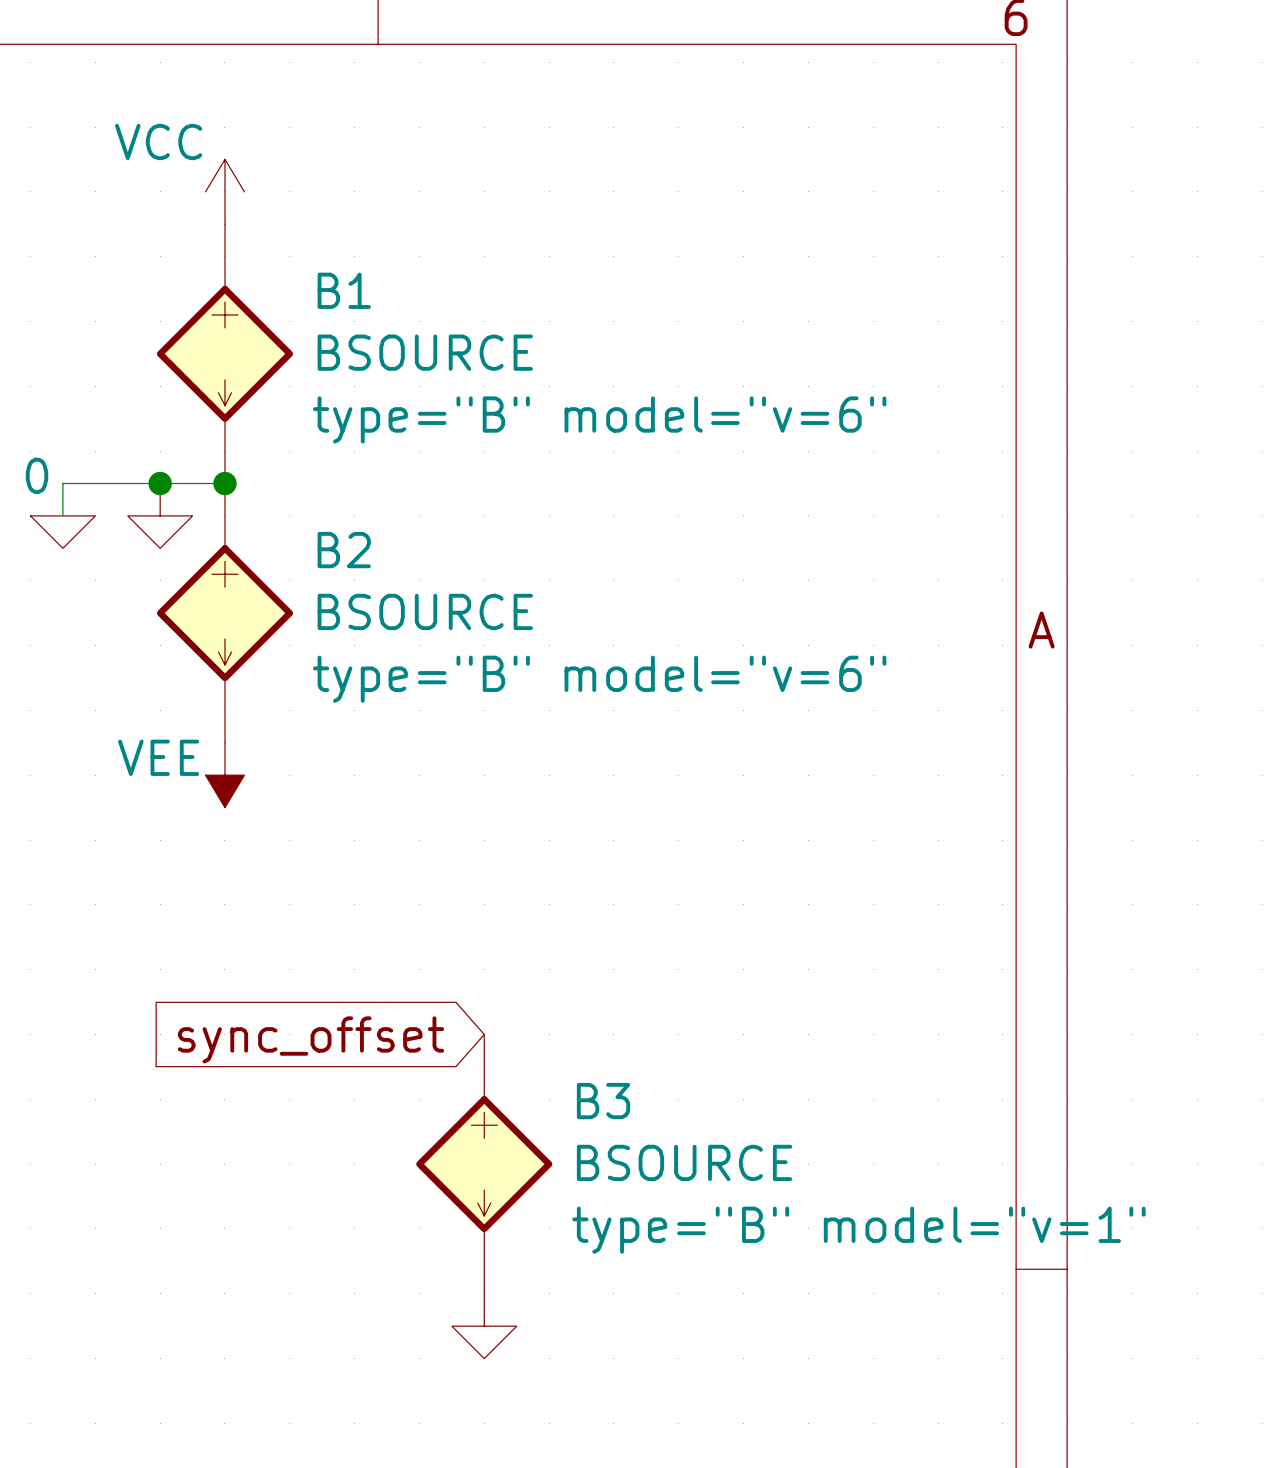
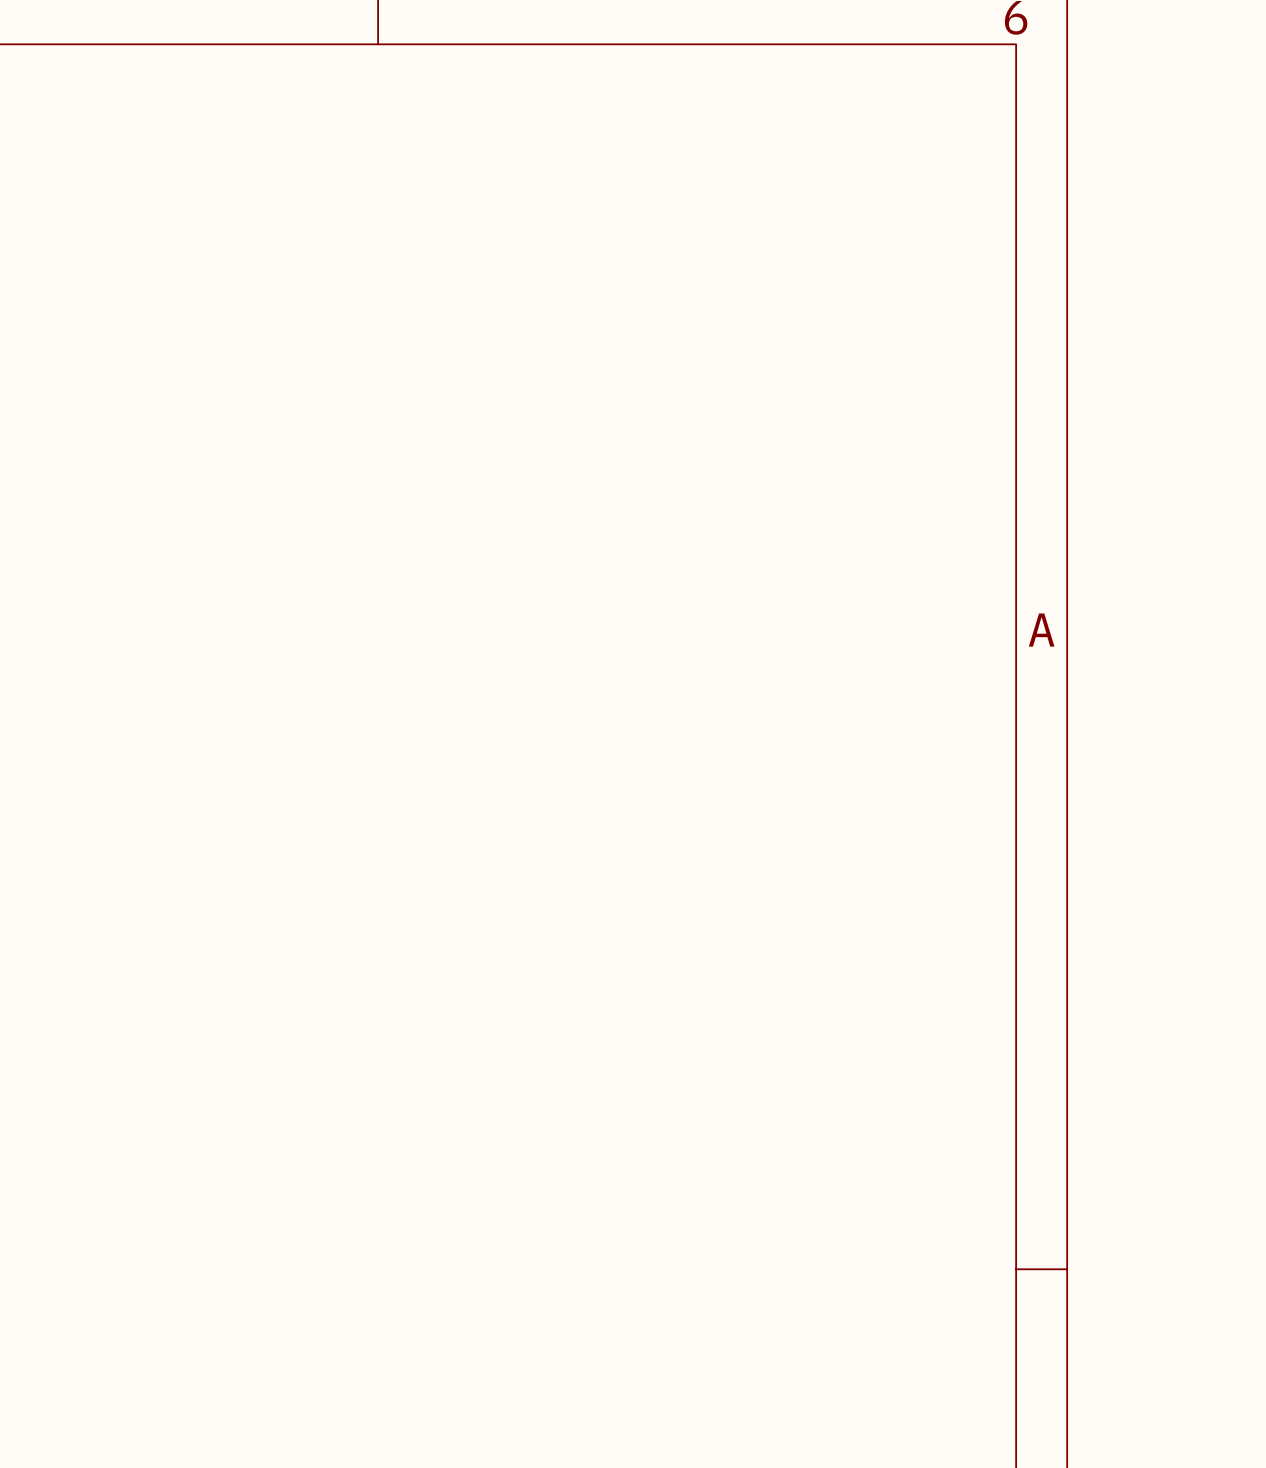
power symbol: VCC (224, 191) -> none
B1: BSOURCE (224, 353) -> none
junction: (160, 483) -> none
wire: (224, 483) (62, 483) (62, 515) -> none
junction: (224, 483) -> none
power symbol: (160, 515) -> none
power symbol: 0 (62, 532) -> none
B2: BSOURCE (224, 613) -> none
power symbol: VEE (224, 775) -> none
global label: sync_offset (310, 1039) -> none
B3: BSOURCE (484, 1164) -> none
power symbol: (484, 1326) -> none

